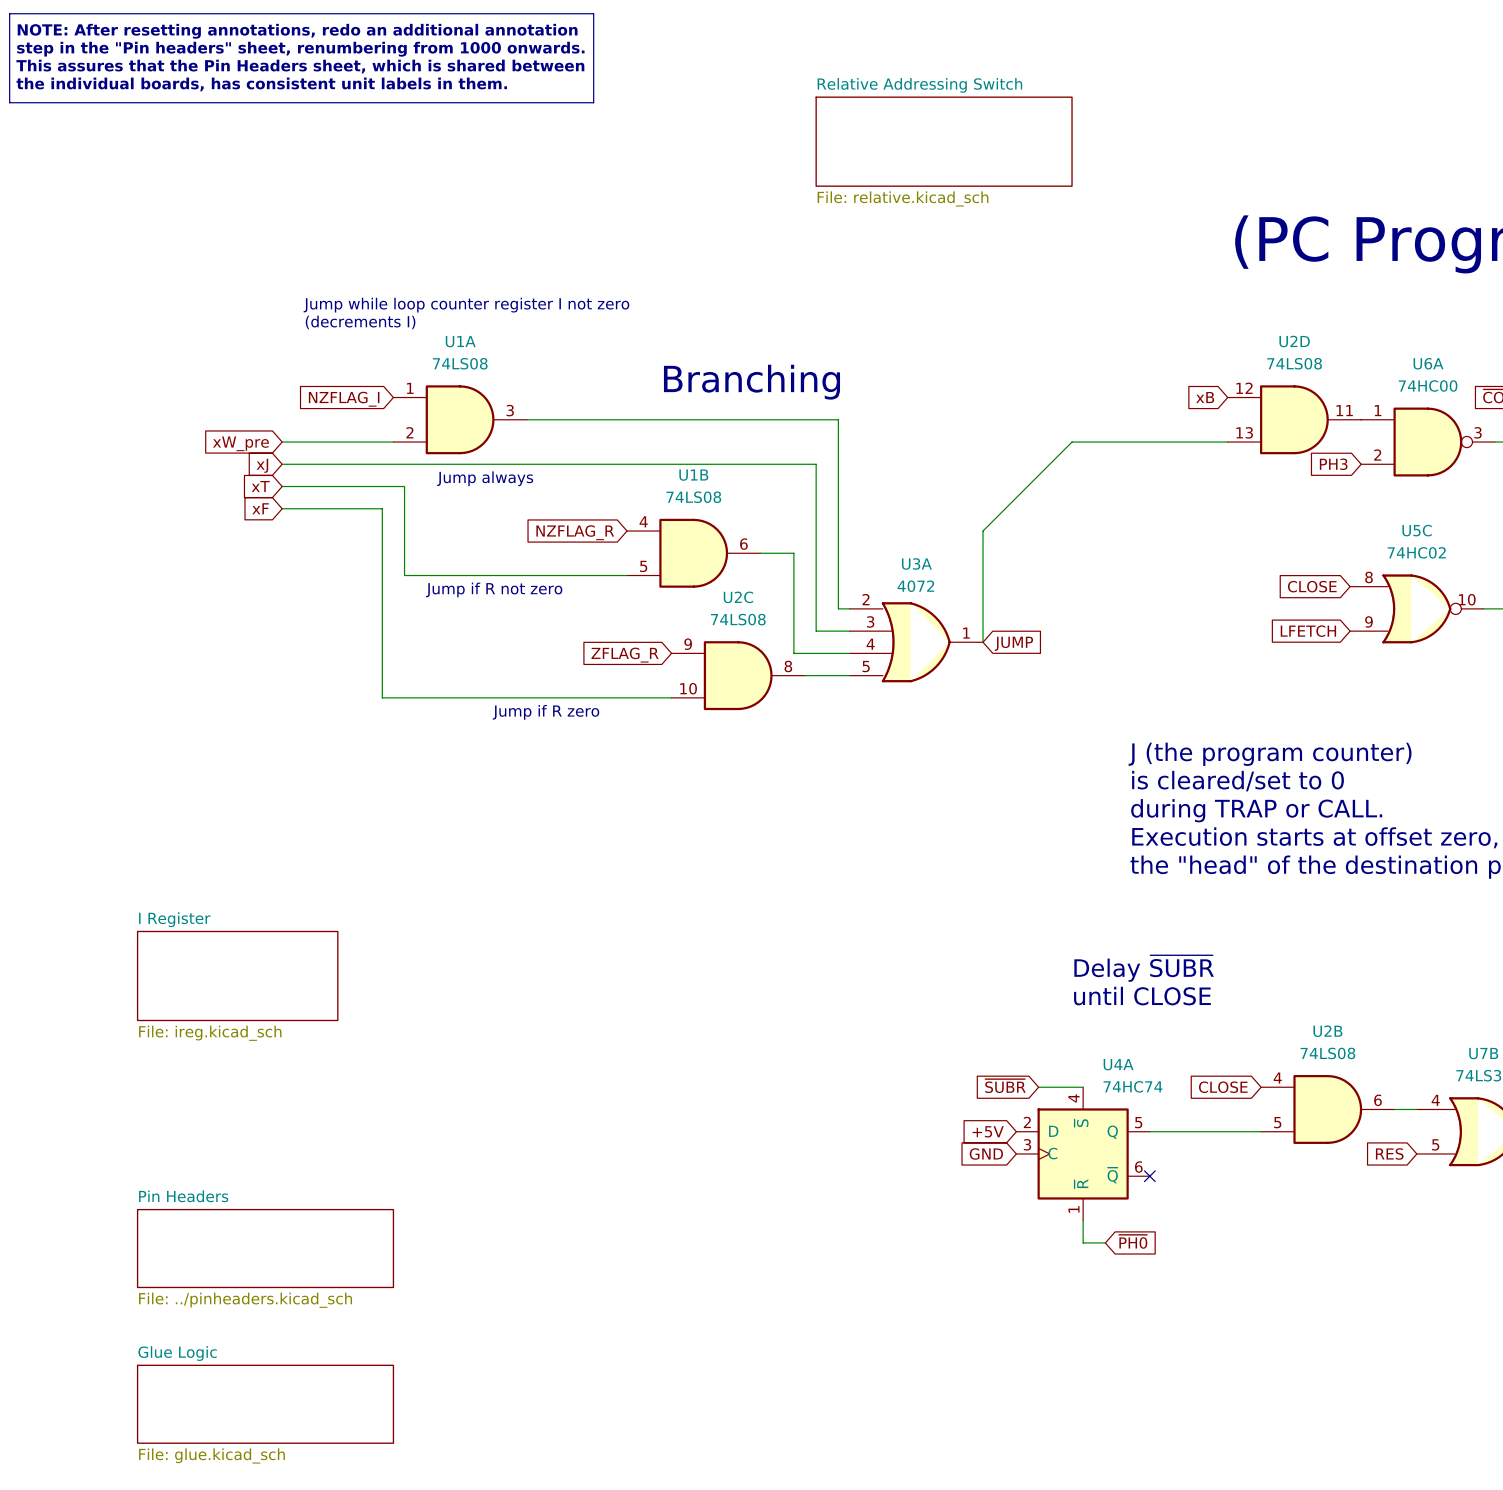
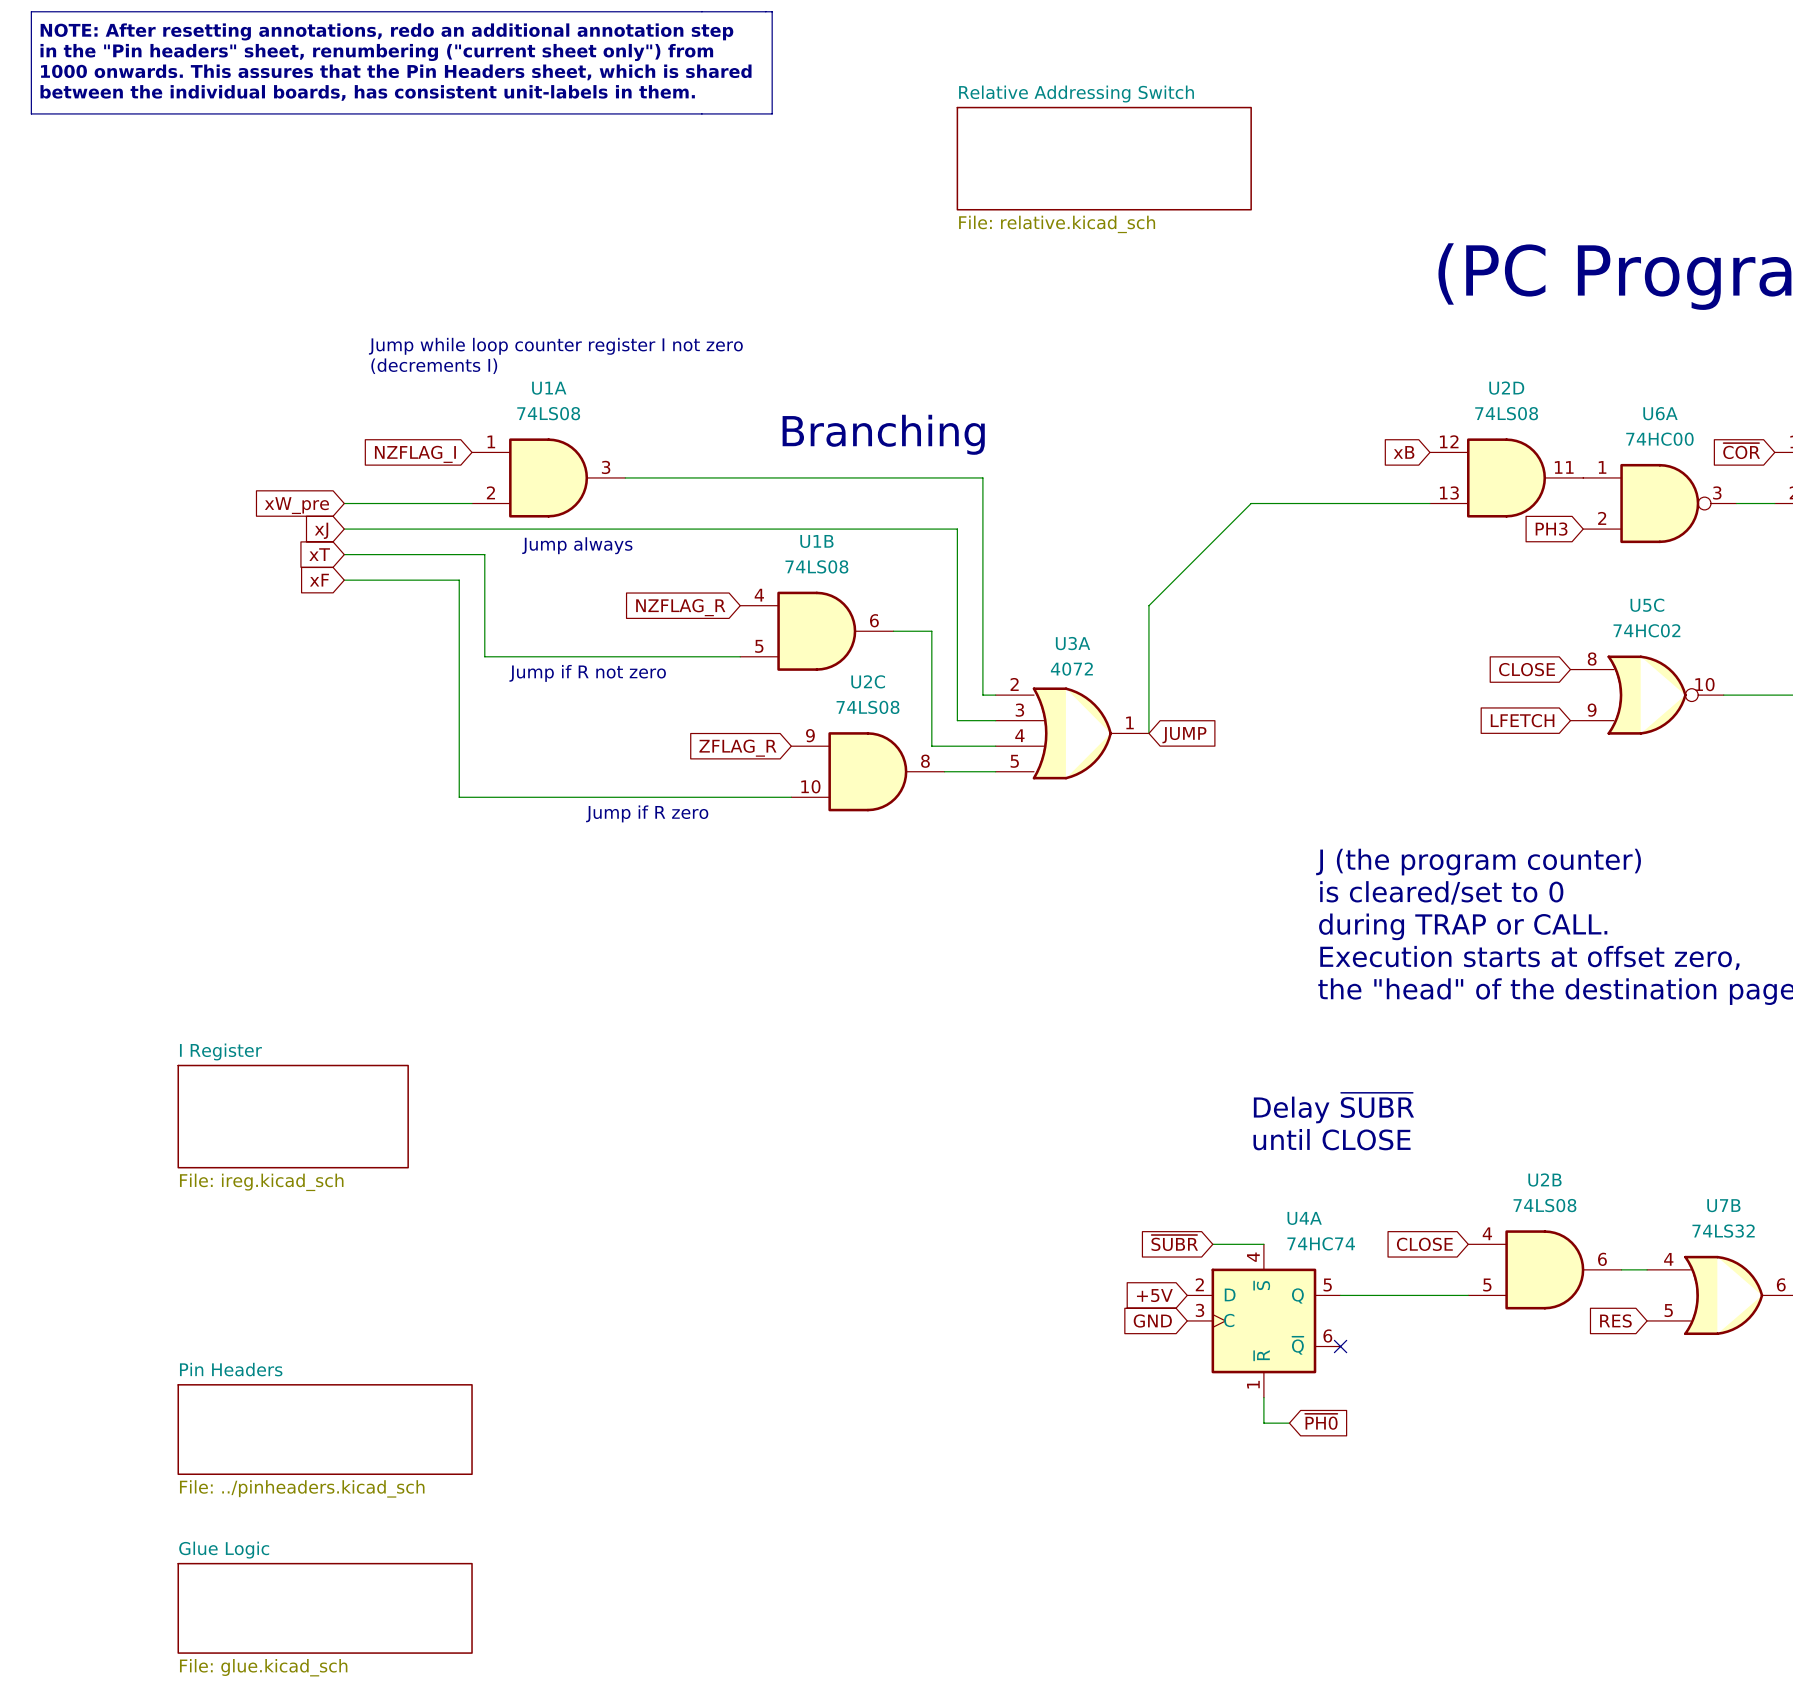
line: (593, 13) (593, 102) -> (701, 11) (772, 11) (772, 113) (701, 113)
text: NOTE: After resetting annotations, redo an additional annotation (297, 31) -> NOTE: After resetting annotations, redo an additional annotation step (386, 31)
text: step in the "Pin headers" sheet, renumbering from 1000 onwards. (300, 49) -> in the "Pin headers" sheet, renumbering ("current sheet only") from (376, 52)
text: This assures that the Pin Headers sheet, which is shared between (300, 66) -> 1000 onwards. This assures that the Pin Headers sheet, which is shared (396, 72)
text: the individual boards, has consistent unit labels in them. (261, 84) -> between the individual boards, has consistent unit-labels in them. (367, 92)

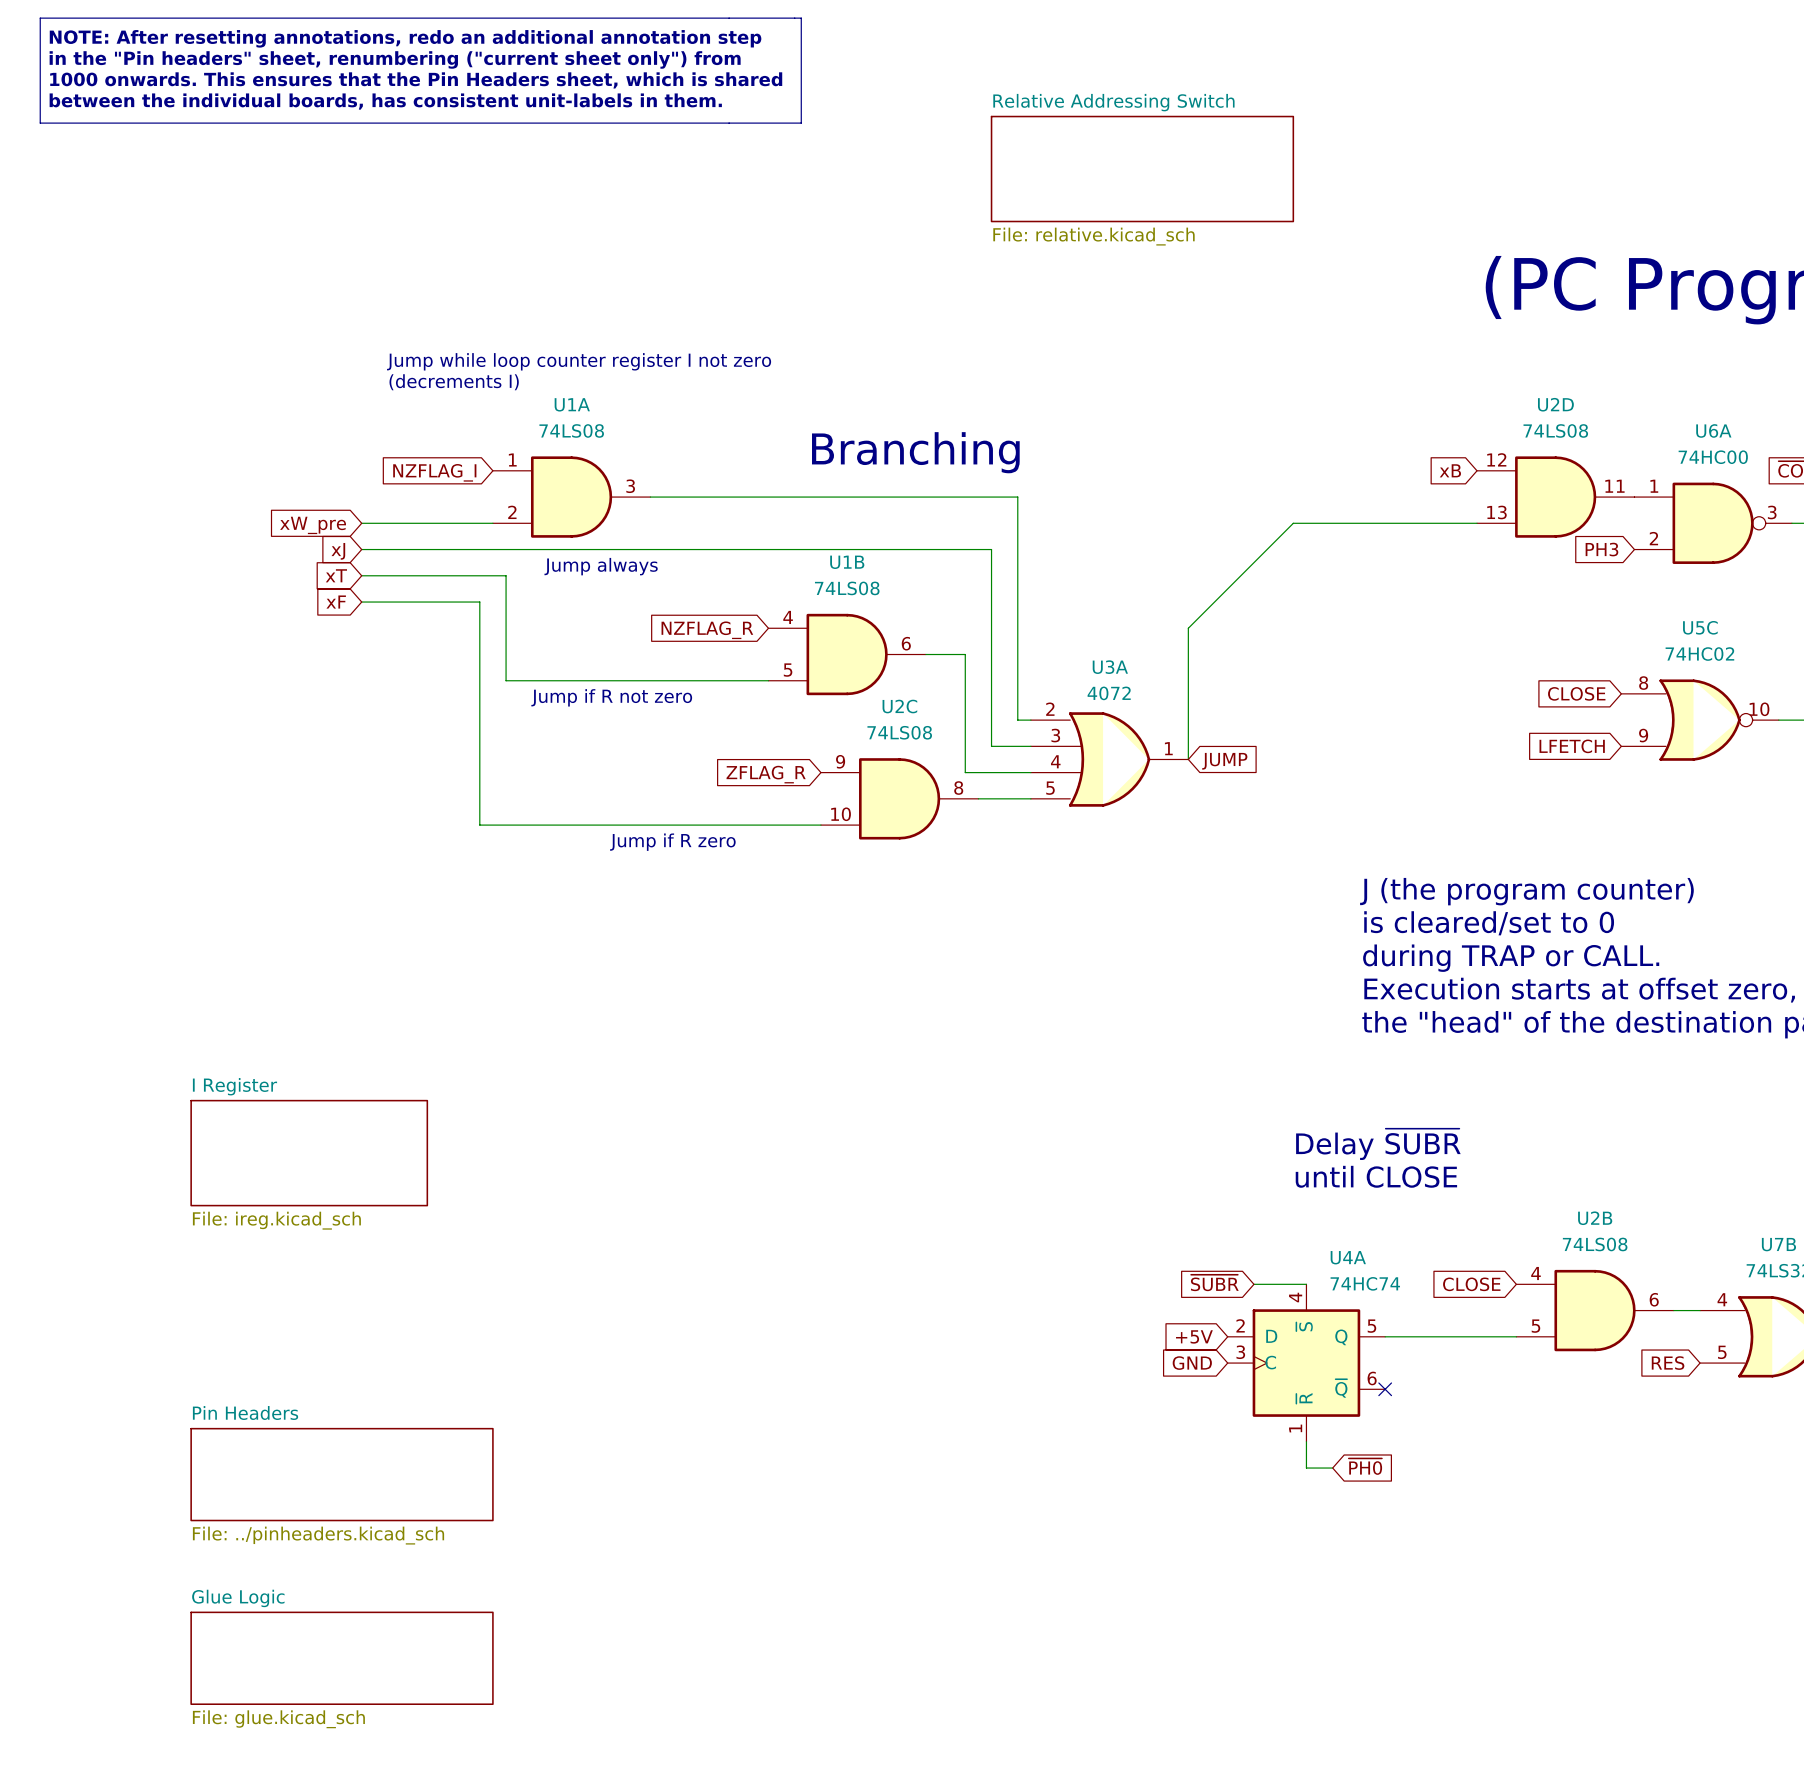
text: 1000 onwards. This assures that the Pin Headers sheet, which is shared (396, 72) -> 1000 onwards. This ensures that the Pin Headers sheet, which is shared (416, 80)

